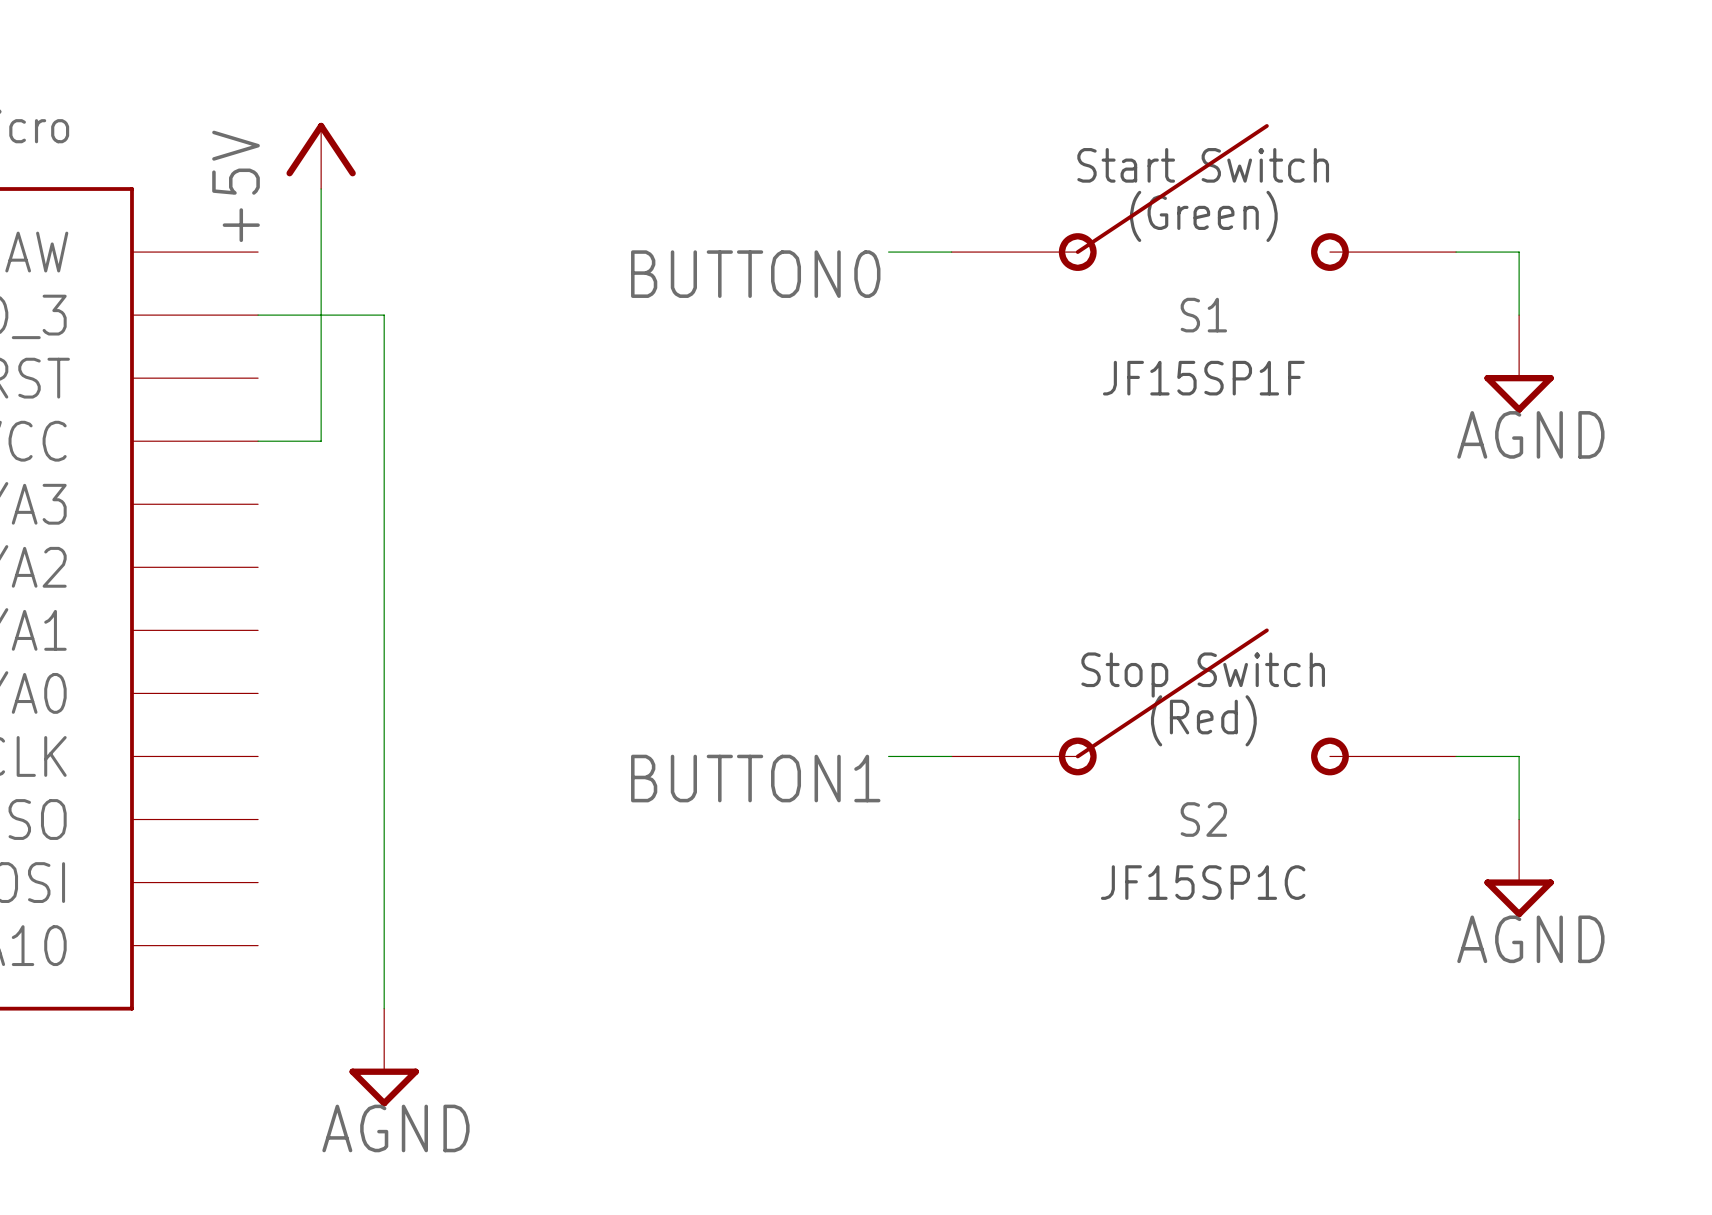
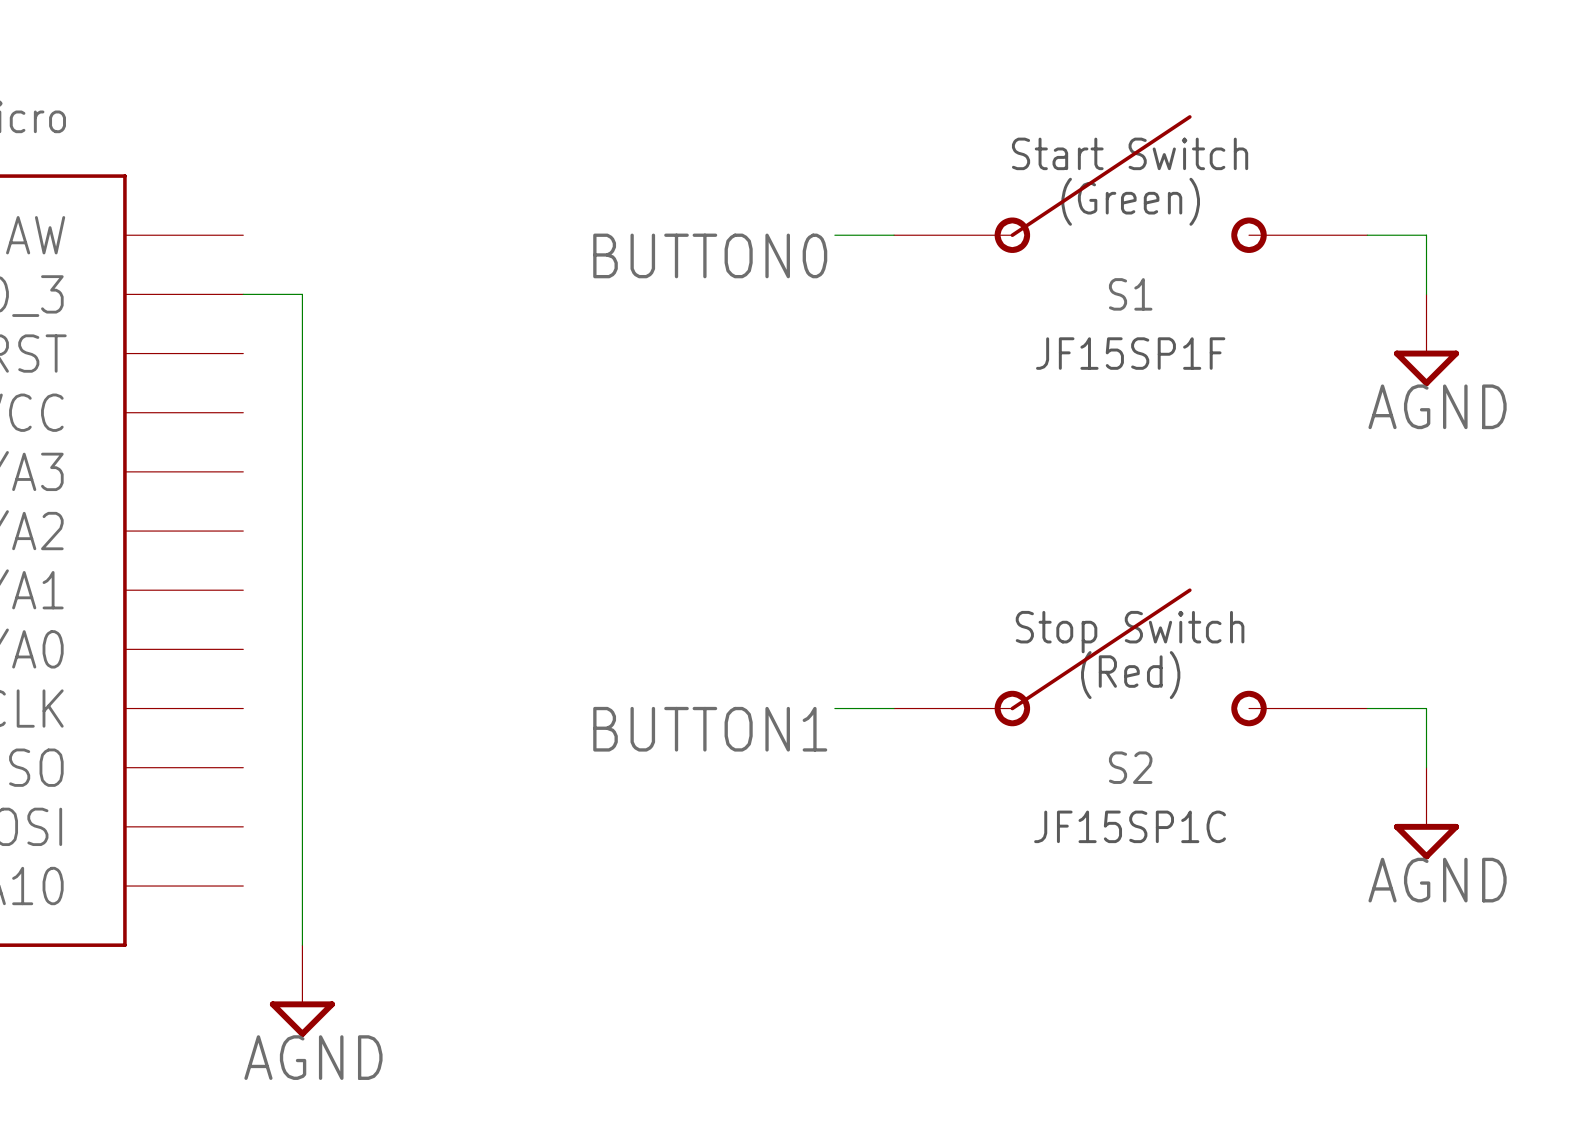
power symbol: +5V (321, 155) -> none
wire: (321, 189) (321, 315) (384, 315) (384, 1008) -> none
wire: (258, 441) (321, 441) -> (302, 945) (302, 412)
power symbol position: AGND (384, 1057) -> AGND (302, 991)

